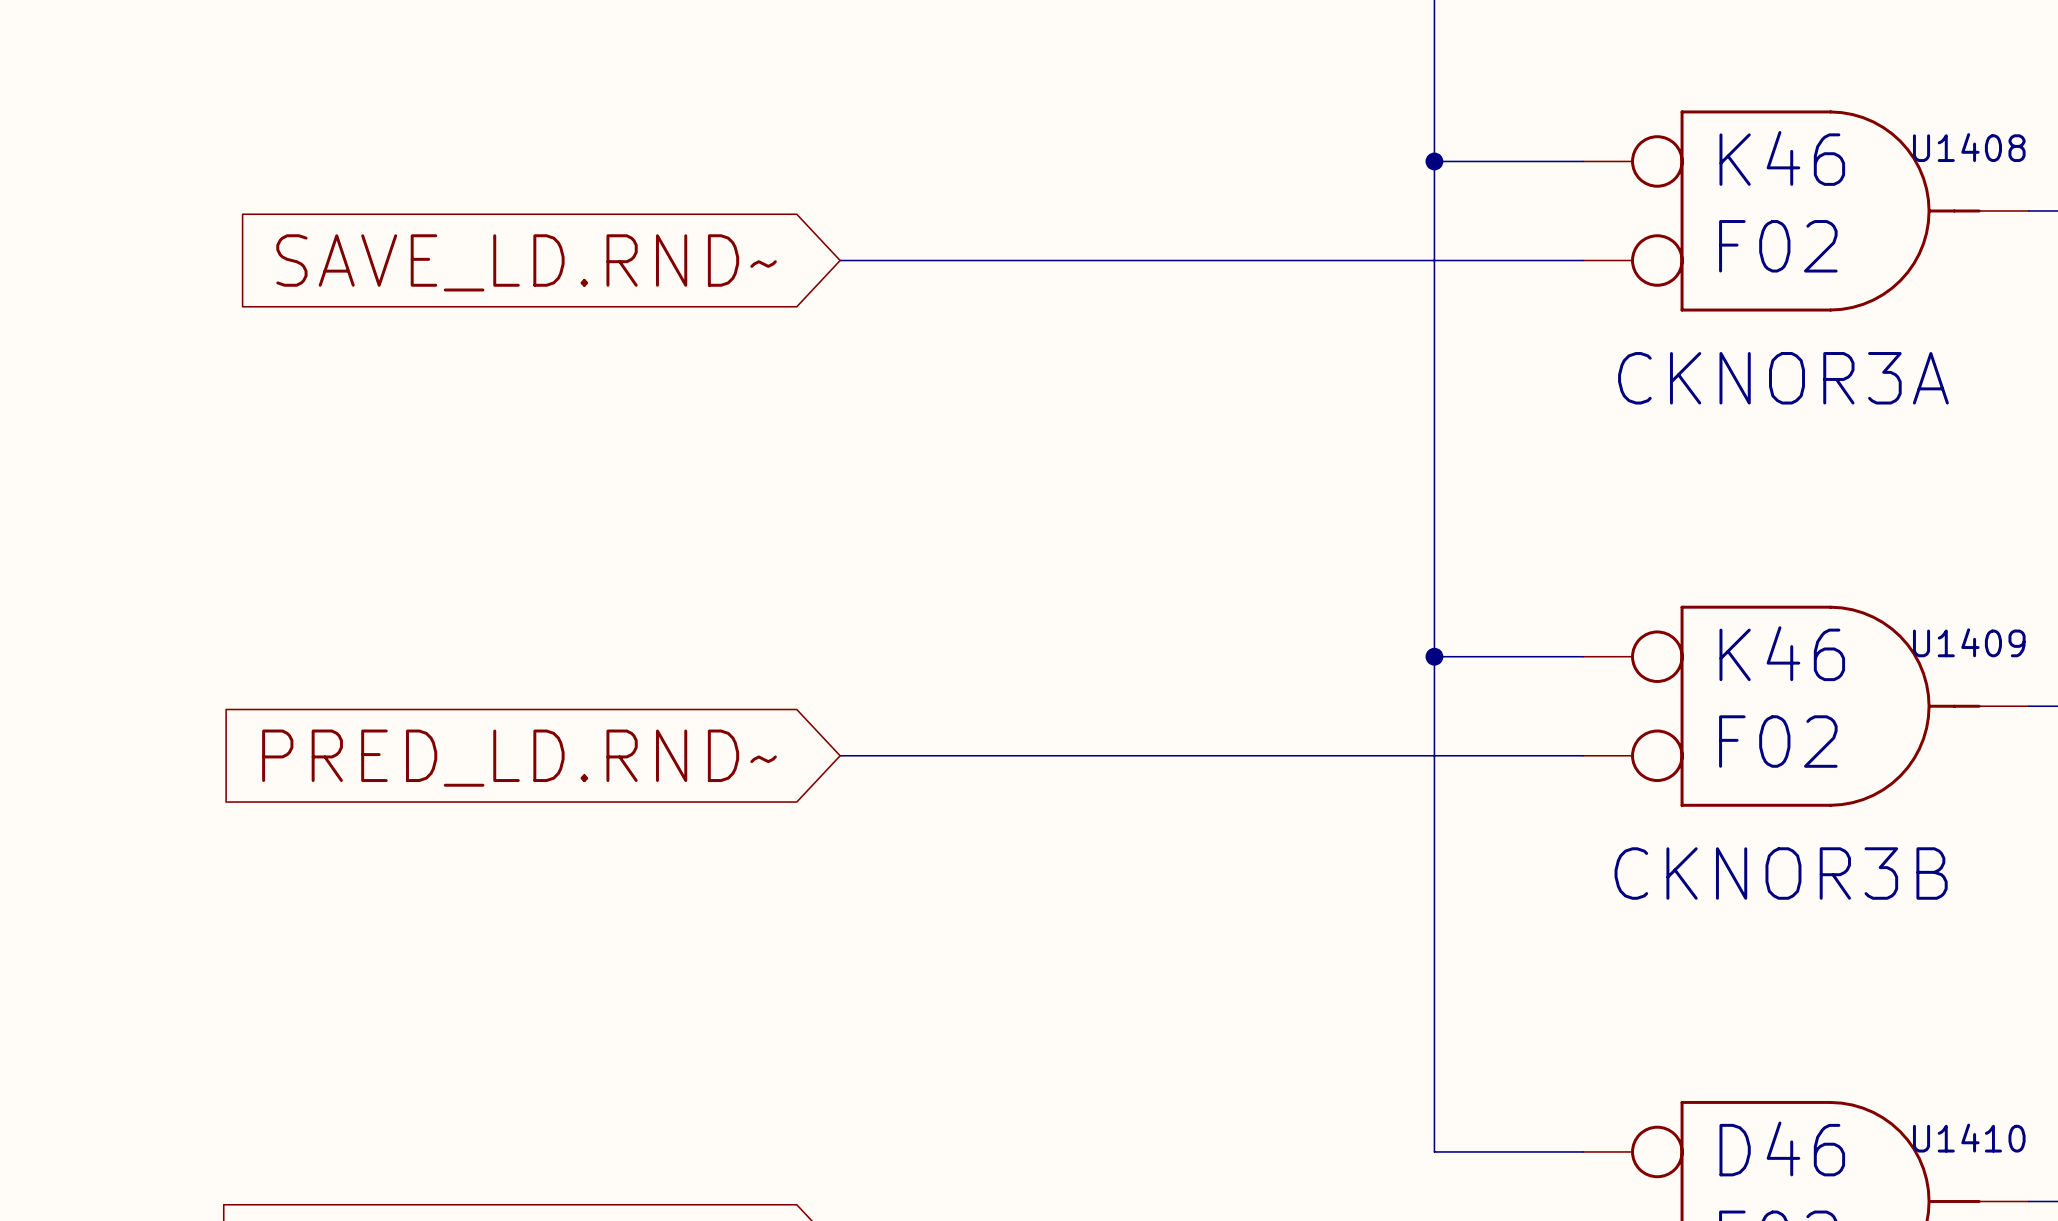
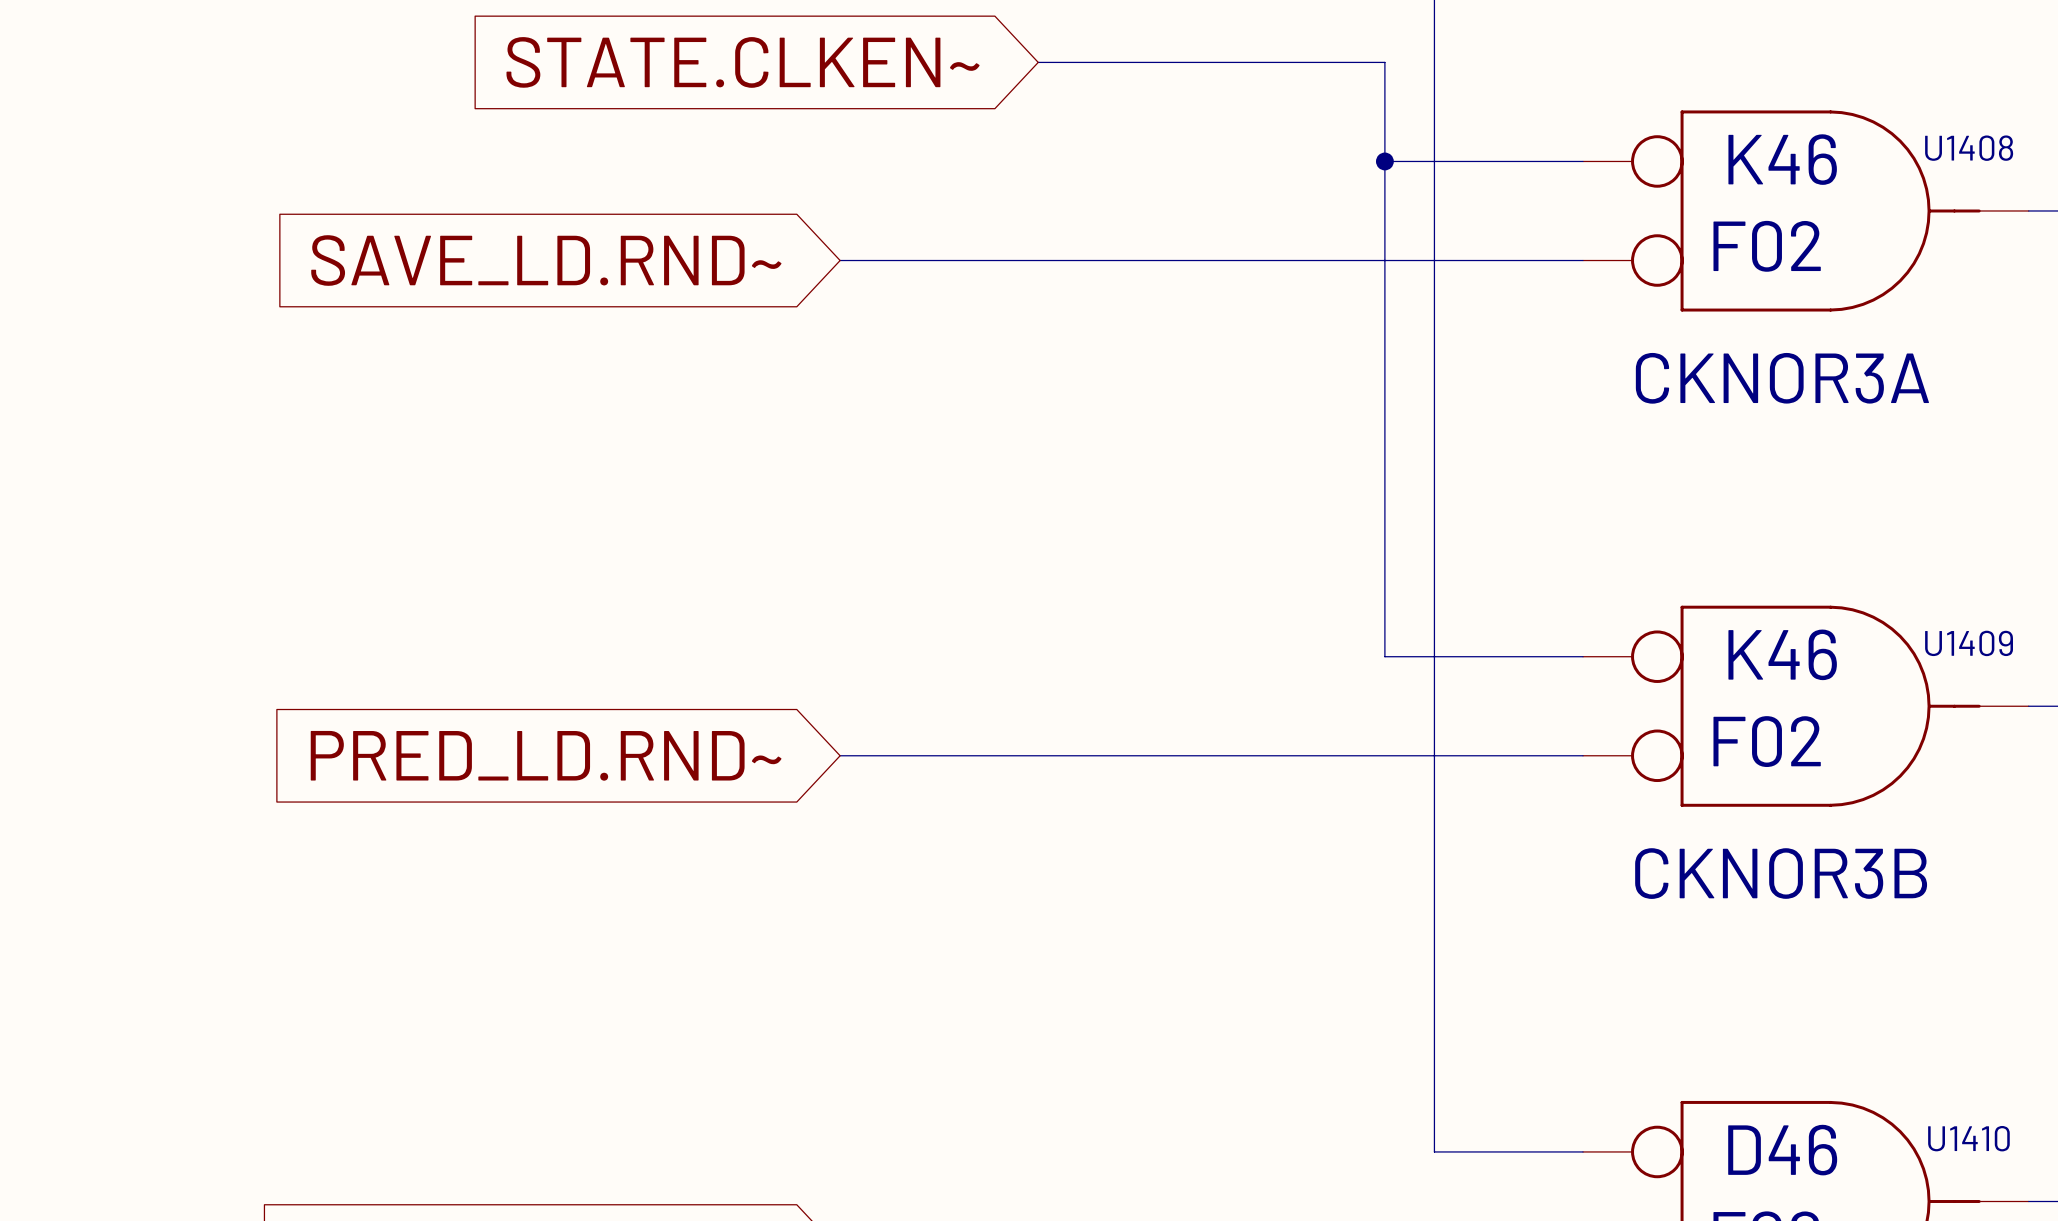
global label: none -> STATE.CLKEN~ (743, 62)
wire: none -> (1038, 62) (1384, 62) (1384, 656) (1434, 656)
wire: none -> (1384, 161) (1434, 161)
junction position: (1434, 161) -> (1384, 161)
junction: (1434, 656) -> none

